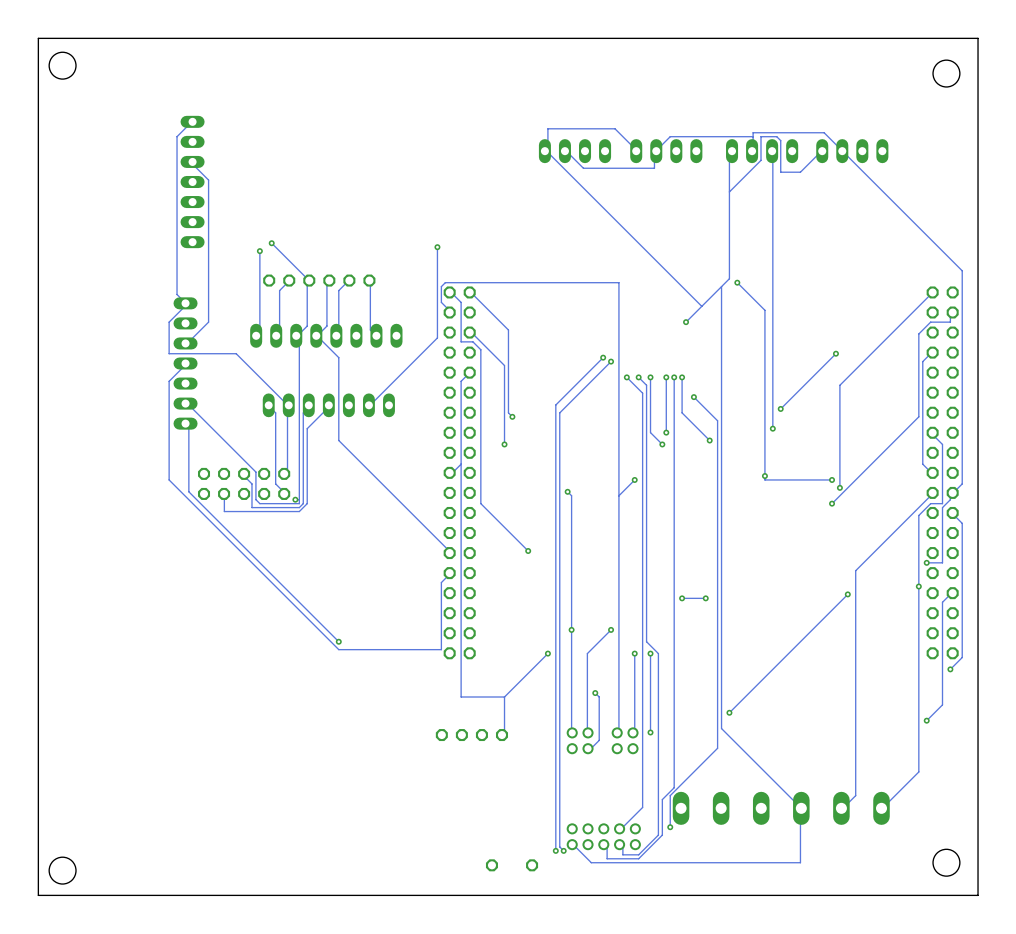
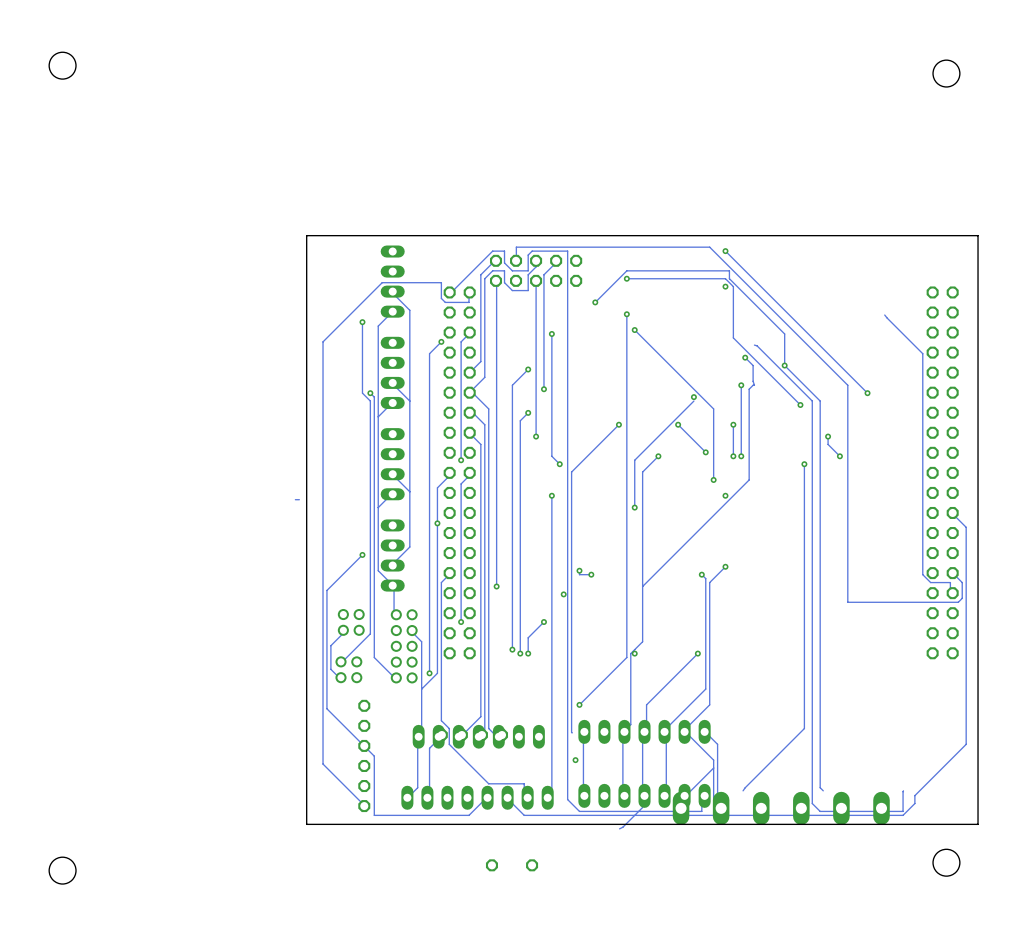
track: (192, 121) (177, 136) (177, 294) (185, 303) (169, 322) (169, 353) (236, 353) (288, 405) (287, 472) (284, 473) -> none
track: (753, 136) (670, 136) (654, 152) (654, 168) (583, 168) (564, 151) -> none
part: (574, 151) -> none
track: (636, 151) (615, 128) (547, 128) (547, 148) (544, 151) (701, 306) -> none
part: (666, 151) -> none
track: (732, 151) (729, 152) (729, 270) -> (595, 302) (626, 270) (729, 270)
track: (752, 151) (753, 132) (824, 132) (962, 270) (962, 483) (952, 492) (950, 499) (942, 507) (942, 562) (926, 562) -> none
part: (762, 151) -> none
track: (772, 151) (772, 428) -> none
track: (822, 151) (800, 172) (780, 172) (780, 140) (776, 136) (761, 136) (761, 160) (729, 191) -> none
part: (852, 151) -> none
track: (192, 161) (208, 180) (208, 322) (185, 343) -> none
part: (192, 181) -> none
board edge: (978, 235) (978, 38) (38, 38) (38, 895) (978, 895) (978, 824) -> (978, 235) (306, 235) (306, 824) (978, 824)
track: (271, 243) (309, 280) (307, 282) (307, 326) (296, 335) (299, 337) (299, 503) (259, 503) (255, 499) (255, 472) (185, 403) -> none
via: (271, 243) -> none
track: (437, 247) (437, 337) (368, 405) -> none
via: (437, 247) -> none
track: (259, 251) (259, 333) (256, 335) -> none
via: (259, 251) -> none
track: none -> (725, 251) (867, 393)
via: none -> (725, 251)
track: none -> (536, 260) (536, 266) (528, 274) (528, 290) (512, 290) (504, 282) (504, 270) (492, 270) (484, 278) (484, 377) (469, 392) (472, 393) (488, 408) (488, 728) (498, 736)
track: none -> (556, 260) (543, 274) (543, 389)
part: none -> (536, 270)
track: none -> (626, 278) (725, 278) (733, 286) (733, 337) (800, 405)
via: none -> (626, 278)
track: (729, 278) (686, 322) -> (729, 278) (784, 333) (784, 365) (820, 401) (820, 787) (823, 790)
track: (289, 280) (279, 290) (279, 333) (276, 335) -> none
part: (319, 280) -> none
track: (329, 280) (326, 282) (326, 326) (316, 335) (338, 357) (338, 440) (449, 553) -> none
track: (349, 280) (338, 290) (338, 333) (336, 335) -> none
track: (369, 280) (370, 330) (376, 335) -> none
track: none -> (495, 280) (496, 586)
track: none -> (536, 280) (536, 436)
part: none -> (392, 281)
track: (737, 282) (764, 310) (764, 479) (832, 479) -> none
via position: (737, 282) -> (725, 286)
track: (441, 286) (445, 282) (618, 282) (618, 732) (617, 732) -> (441, 286) (441, 282) (382, 282) (323, 341) (323, 764) (364, 806)
track: (721, 286) (721, 728) (801, 808) (800, 862) (591, 862) (572, 844) -> none
track: none -> (392, 291) (409, 310) (409, 547) (392, 565)
track: (449, 292) (461, 302) (461, 341) (472, 341) (480, 349) -> (495, 260) (480, 274) (480, 349)
track: none -> (449, 292) (492, 251) (504, 251) (504, 262) (512, 270) (528, 270) (528, 255) (532, 251) (567, 251) (567, 799) (579, 811) (701, 811) (701, 799) (704, 795)
track: (469, 292) (508, 330) (508, 412) (512, 416) -> none
track: (932, 292) (839, 385) (839, 487) -> none
track: (441, 298) (441, 302) (449, 312) -> (441, 298) (445, 302) (469, 302) (469, 292)
via: none -> (595, 302)
track: none -> (392, 311) (378, 326) (378, 570) (394, 586) (394, 614) (396, 614)
track: (952, 312) (950, 314) (950, 322) (930, 322) (918, 333) (918, 416) (832, 503) -> none
track: none -> (626, 314) (626, 657) (579, 704)
via: none -> (626, 314)
track: none -> (362, 322) (362, 393) (370, 401) (370, 633) (341, 661)
via: none -> (362, 322)
via: (686, 322) -> none
track: none -> (634, 330) (713, 408) (713, 479)
via: none -> (634, 330)
track: (469, 332) (504, 365) (504, 444) -> (469, 332) (461, 341) (461, 381)
track: none -> (551, 333) (551, 456) (559, 464)
via: none -> (551, 333)
part: (326, 335) -> none
track: none -> (441, 341) (429, 353) (429, 673)
via: none -> (441, 341)
track: none -> (754, 345) (812, 401) (812, 803) (820, 811) (903, 811) (903, 790)
track: (932, 352) (922, 361) -> (884, 315) (922, 353) (922, 361)
track: (835, 353) (780, 408) -> none
via: (835, 353) -> none
track: (603, 357) (555, 405) (555, 850) -> none
via: (603, 357) -> none
track: none -> (745, 357) (753, 365) (754, 385) (749, 389) (749, 479) (642, 586)
via: none -> (745, 357)
track: (480, 361) (480, 444) -> (469, 432) (480, 444)
track: (611, 361) (559, 412) (559, 846) (563, 850) -> none
via: (611, 361) -> none
track: (185, 363) (169, 381) (169, 479) (338, 649) (441, 649) -> (527, 797) (524, 795) (524, 783) (488, 783) (449, 744) (449, 728) (441, 720) (441, 649)
part: (185, 363) -> none
via: none -> (784, 365)
track: none -> (528, 369) (512, 385) (512, 649)
via: none -> (528, 369)
part: none -> (392, 372)
track: (469, 372) (461, 381) -> (469, 372) (480, 361)
track: (626, 377) (642, 393) (642, 472) -> (658, 456) (642, 472)
via: (626, 377) -> none
track: (638, 377) (646, 385) (646, 641) (658, 653) (658, 835) (638, 854) (622, 854) (622, 846) (619, 844) -> none
via: (638, 377) -> none
track: (650, 377) (650, 432) (662, 444) -> none
via: (650, 377) -> none
track: (666, 377) (666, 432) -> none
via: (666, 377) -> none
track: (674, 377) (674, 787) (662, 799) (662, 835) (638, 858) (607, 858) (607, 846) (603, 844) -> none
via: (674, 377) -> none
track: (682, 377) (682, 412) (709, 440) -> none
via: (682, 377) -> none
track: none -> (392, 382) (409, 401)
track: none -> (741, 385) (741, 456)
via: none -> (741, 385)
via: none -> (543, 389)
track: none -> (370, 393) (374, 397) (374, 657) (396, 677)
via: none -> (370, 393)
via: none -> (867, 393)
track: (693, 397) (717, 420) (717, 744) -> (704, 731) (717, 744)
track: none -> (693, 401) (634, 460) (634, 507)
track: none -> (392, 402) (378, 416)
track: (268, 405) (275, 412) (275, 483) (284, 493) -> none
track: (308, 405) (303, 412) (303, 503) (299, 507) (251, 507) (251, 483) (244, 473) -> none
track: (328, 405) (307, 428) (307, 503) (299, 511) (224, 511) (224, 493) -> none
part: (328, 405) -> none
via: none -> (800, 405)
via: (780, 408) -> none
track: none -> (469, 412) (472, 412) (484, 424) (484, 732) (478, 736)
track: none -> (528, 412) (520, 420) (520, 653)
via: none -> (528, 412)
via: (512, 416) -> none
track: (185, 423) (188, 424) (188, 491) (338, 641) -> none
via: none -> (618, 424)
track: none -> (678, 424) (705, 452)
via: none -> (678, 424)
track: none -> (733, 424) (733, 456)
via: none -> (733, 424)
via: (772, 428) -> none
via: (666, 432) -> none
track: (932, 432) (942, 444) (942, 503) (930, 503) (918, 515) (918, 771) (881, 808) -> none
via: none -> (536, 436)
track: none -> (828, 436) (828, 444) (839, 456)
via: none -> (828, 436)
via position: (709, 440) -> (705, 452)
via: (504, 444) -> none
via: (662, 444) -> none
via: none -> (658, 456)
via: none -> (733, 456)
via: none -> (741, 456)
via: none -> (839, 456)
track: (461, 460) (461, 483) -> (469, 472) (461, 483)
via: none -> (461, 460)
part: none -> (392, 464)
track: (461, 464) (453, 472) (449, 472) -> (421, 689) (437, 673) (437, 487) (449, 476) (449, 472)
via: none -> (559, 464)
track: none -> (804, 464) (804, 728) (743, 790)
via: none -> (804, 464)
track: (922, 464) (932, 472) -> (922, 464) (922, 574) (930, 582) (950, 582) (950, 590) (952, 593)
track: none -> (392, 474) (409, 491)
via: (764, 476) -> none
track: (634, 479) (618, 495) -> none
via: (634, 479) -> none
via: none -> (713, 479)
via: (832, 479) -> none
part: (244, 483) -> none
via: (839, 487) -> none
track: (567, 491) (571, 495) -> (618, 424) (571, 472) (571, 495)
via: (567, 491) -> none
track: (932, 492) (855, 570) (855, 795) (841, 808) -> none
track: none -> (392, 494) (378, 507)
track: none -> (551, 495) (551, 791) (547, 797)
via: none -> (551, 495)
via: none -> (725, 495)
via: (295, 499) -> none
track: (480, 503) (528, 551) -> (480, 503) (480, 716) (458, 736)
via: (832, 503) -> none
via: none -> (634, 507)
via: none -> (437, 523)
track: (962, 523) (962, 582) -> (952, 573) (962, 582)
via: (528, 551) -> none
track: none -> (362, 554) (326, 590) (326, 708) (374, 756) (374, 815) (469, 815) (487, 797)
via: none -> (362, 554)
part: none -> (392, 555)
via: (926, 562) -> none
track: none -> (725, 566) (709, 582) (709, 704) (684, 731) (713, 760) (713, 815) (524, 815) (507, 797)
via: none -> (725, 566)
track: none -> (579, 570) (579, 574) (591, 574)
via: none -> (579, 570)
via: none -> (591, 574)
track: none -> (701, 574) (705, 578) (705, 689) (664, 731) (666, 732) (666, 795) (664, 795)
via: none -> (701, 574)
via: none -> (496, 586)
via: (918, 586) -> none
track: (952, 593) (942, 602) (942, 704) (926, 720) -> none
via: none -> (563, 594)
track: (847, 594) (729, 712) -> none
via: (847, 594) -> none
via: (682, 598) -> none
track: (705, 598) (682, 598) -> none
via: (705, 598) -> none
track: (962, 598) (962, 657) (950, 669) -> (962, 598) (958, 602) (847, 602) (847, 385) (709, 247) (516, 247) (516, 260)
part: none -> (351, 622)
track: (461, 622) (461, 696) (504, 696) -> none
via: none -> (461, 622)
track: none -> (543, 622) (528, 637) (528, 653)
via: none -> (543, 622)
via: (571, 629) -> none
track: (611, 629) (587, 653) (588, 732) -> none
via: (611, 629) -> none
track: none -> (343, 630) (342, 633) (330, 645) (330, 669) (341, 677)
track: none -> (412, 630) (421, 641) (421, 736) (418, 736) (417, 740) (417, 787) (407, 797)
via: (338, 641) -> none
track: (642, 641) (642, 732) -> (697, 653) (646, 704) (646, 728) (642, 732)
track: none -> (642, 641) (630, 653) (630, 724) (622, 732) (622, 795) (624, 795)
part: none -> (404, 646)
via: none -> (512, 649)
via: none -> (520, 653)
via: none -> (528, 653)
track: (547, 653) (504, 696) -> none
via: (547, 653) -> none
track: (634, 653) (634, 732) (632, 732) -> none
track: (650, 653) (650, 732) -> none
via: (650, 653) -> none
via: none -> (697, 653)
part: none -> (348, 669)
via: (950, 669) -> none
via: none -> (429, 673)
track: (595, 693) (599, 696) (599, 740) (591, 748) (588, 748) -> none
via position: (595, 693) -> (579, 704)
track: (504, 696) (504, 732) (501, 735) -> none
via: (729, 712) -> none
via: (926, 720) -> none
track: none -> (584, 731) (584, 795)
part: none -> (644, 731)
via: (650, 732) -> none
track: none -> (438, 736) (429, 748) (429, 795) (427, 797)
part: none -> (478, 736)
part: (580, 740) -> none
part: (625, 740) -> none
track: (717, 748) (670, 795) (670, 827) -> (717, 748) (717, 815) (903, 815) (914, 803) (914, 795) (966, 744) (966, 527) (962, 523)
part: none -> (364, 755)
via: none -> (575, 760)
track: none -> (713, 768) (684, 795)
part: none -> (644, 795)
part: none -> (477, 797)
via: (670, 827) -> none
part: (603, 836) -> none
via: (555, 850) -> none
via: (563, 850) -> none

